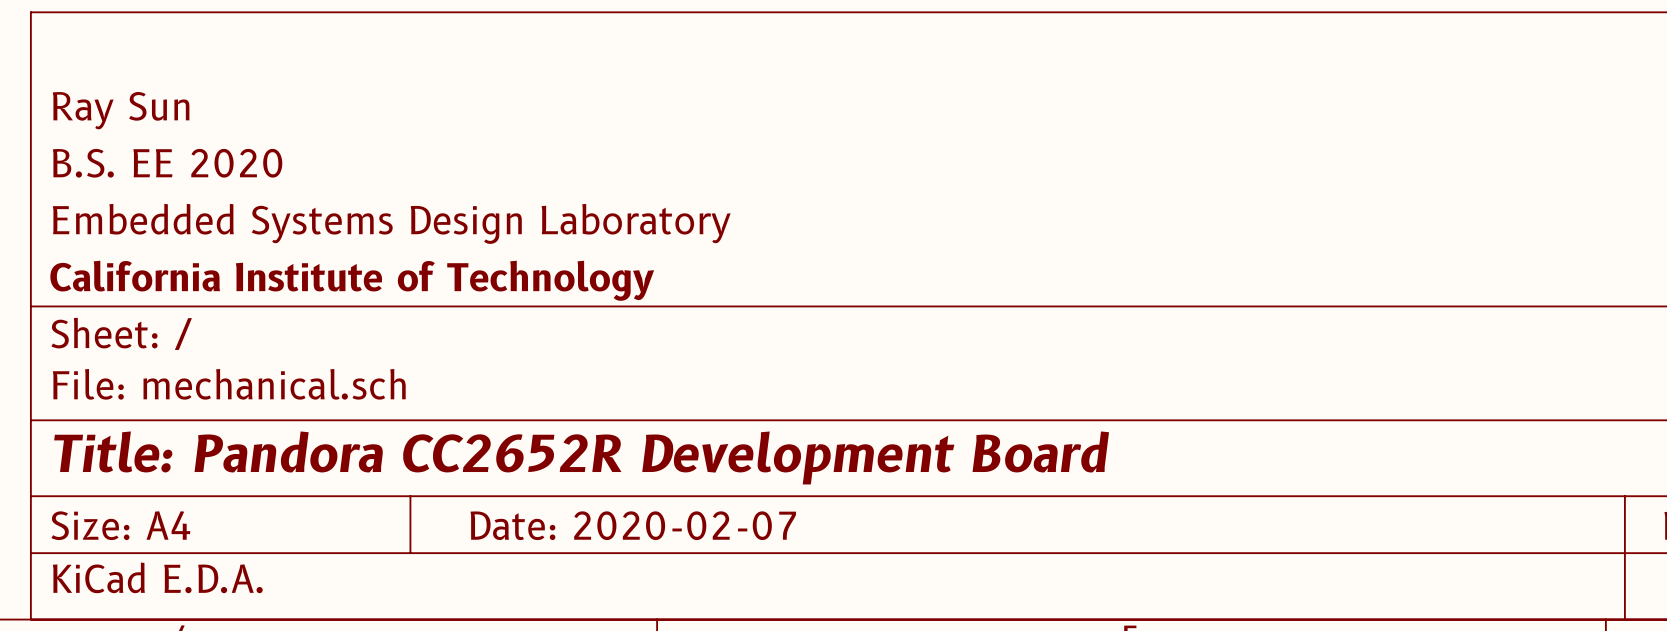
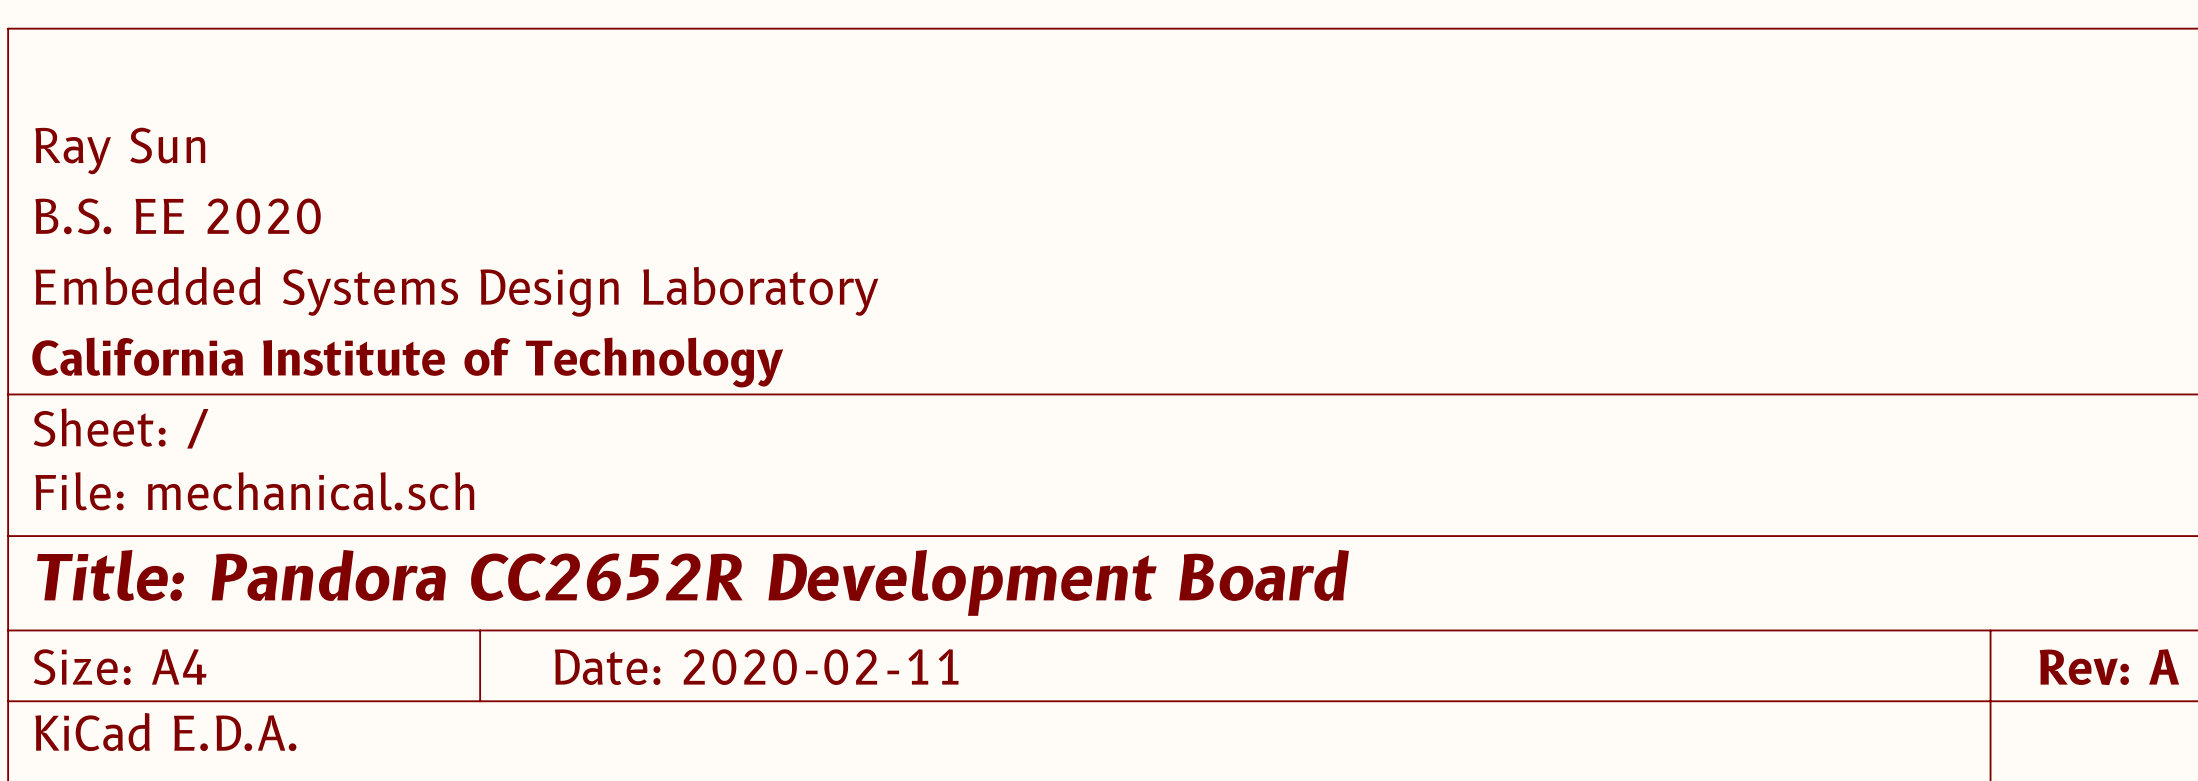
title block: Date: 2020-02-07 (633, 525) -> Date: 2020-02-11 (756, 667)

